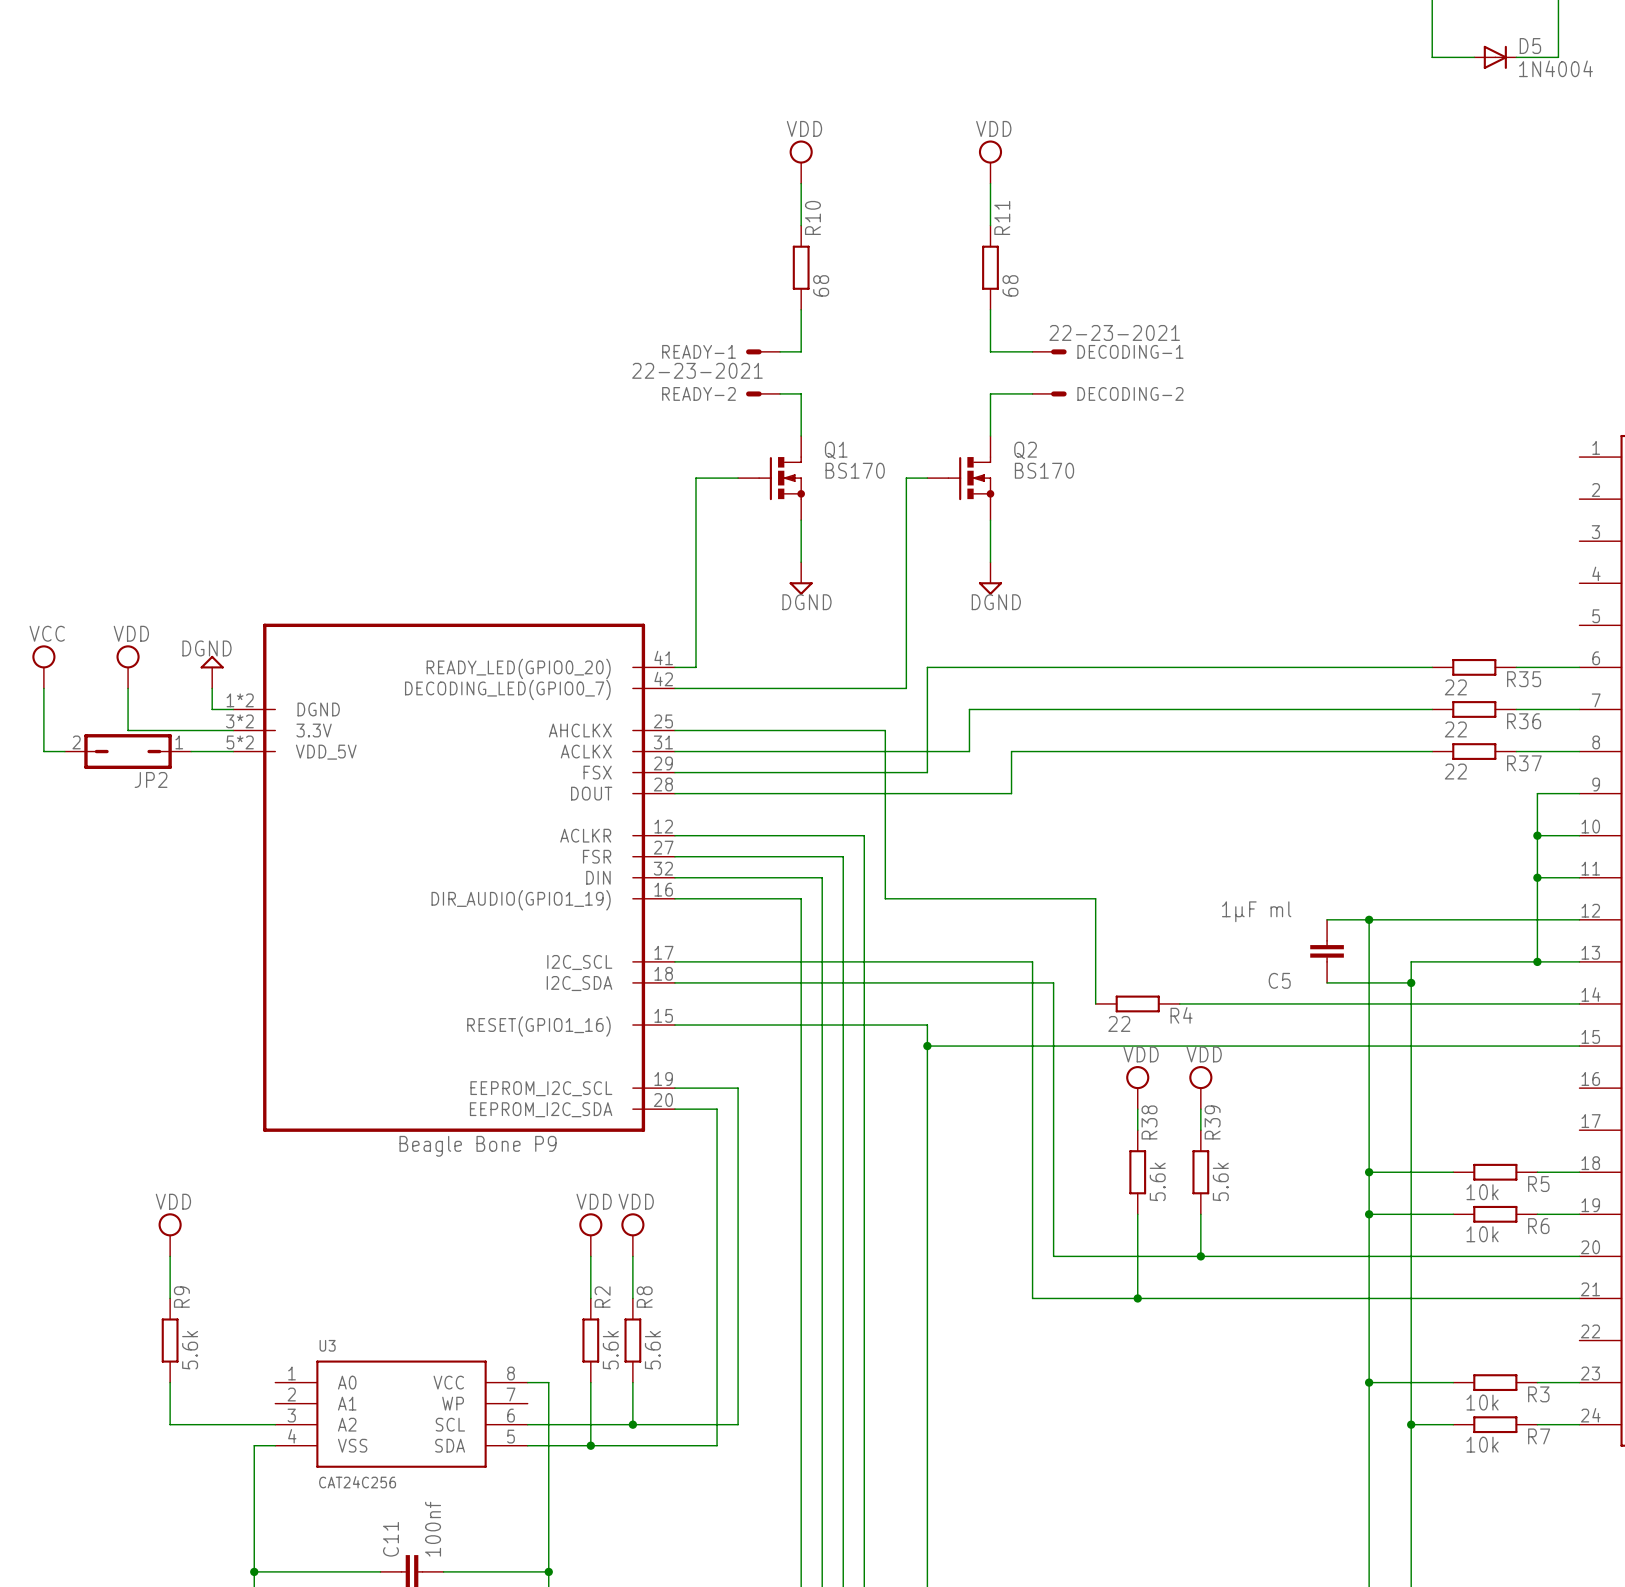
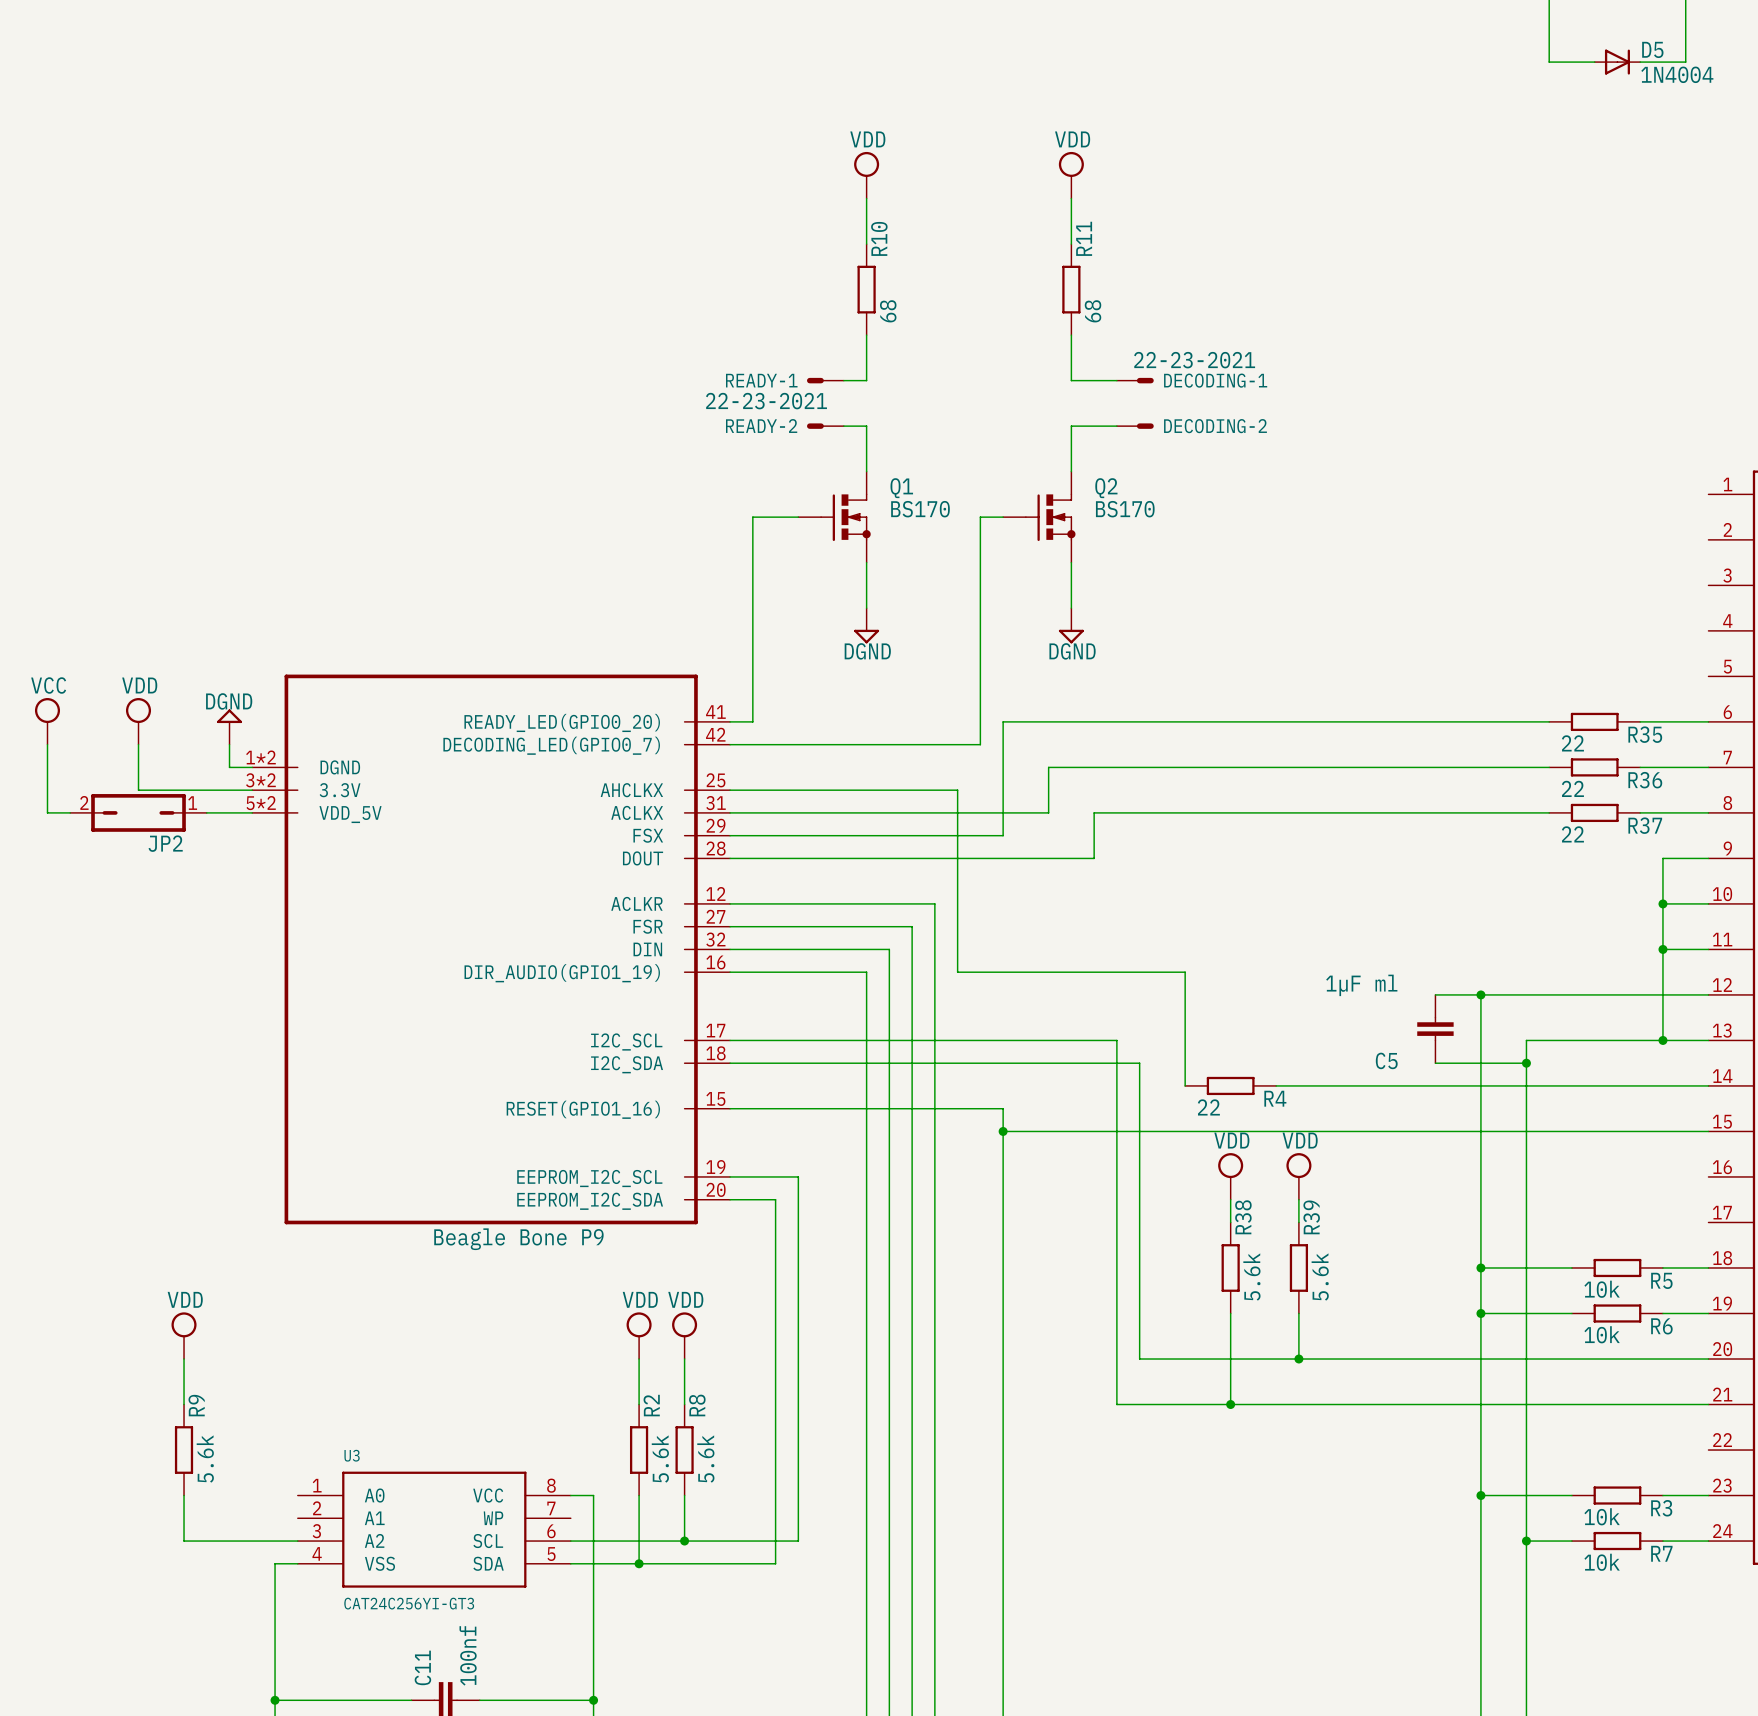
U3 value: CAT24C256 (357, 1482) -> CAT24C256YI-GT3 (409, 1603)

